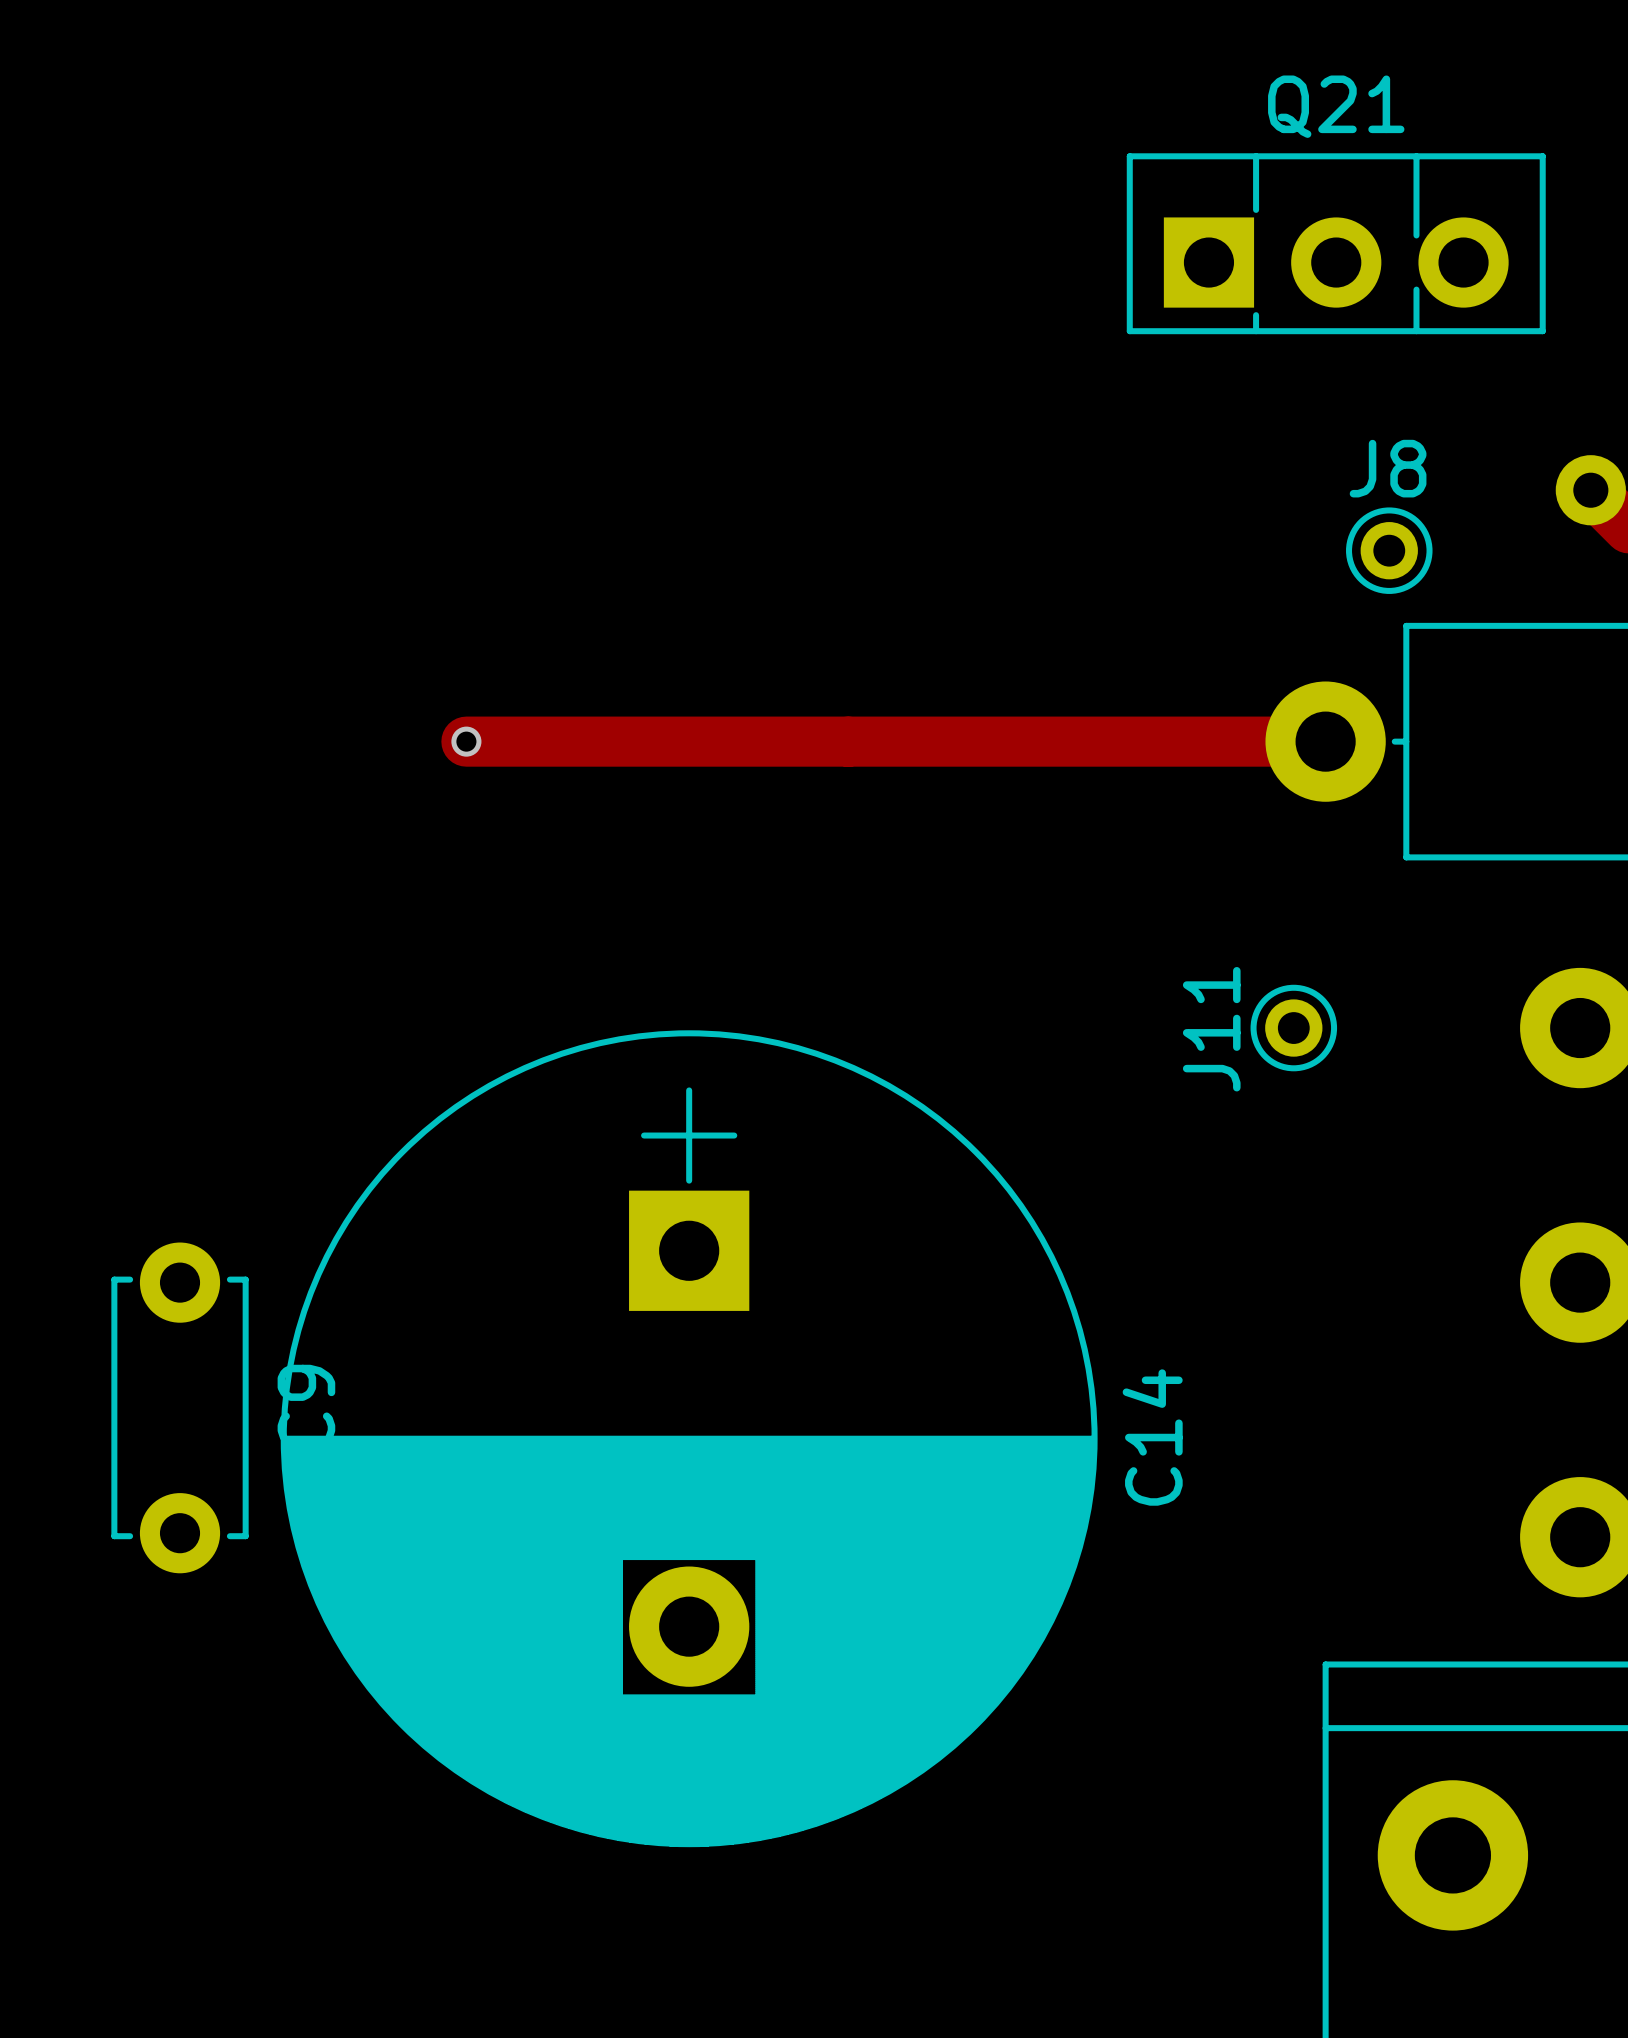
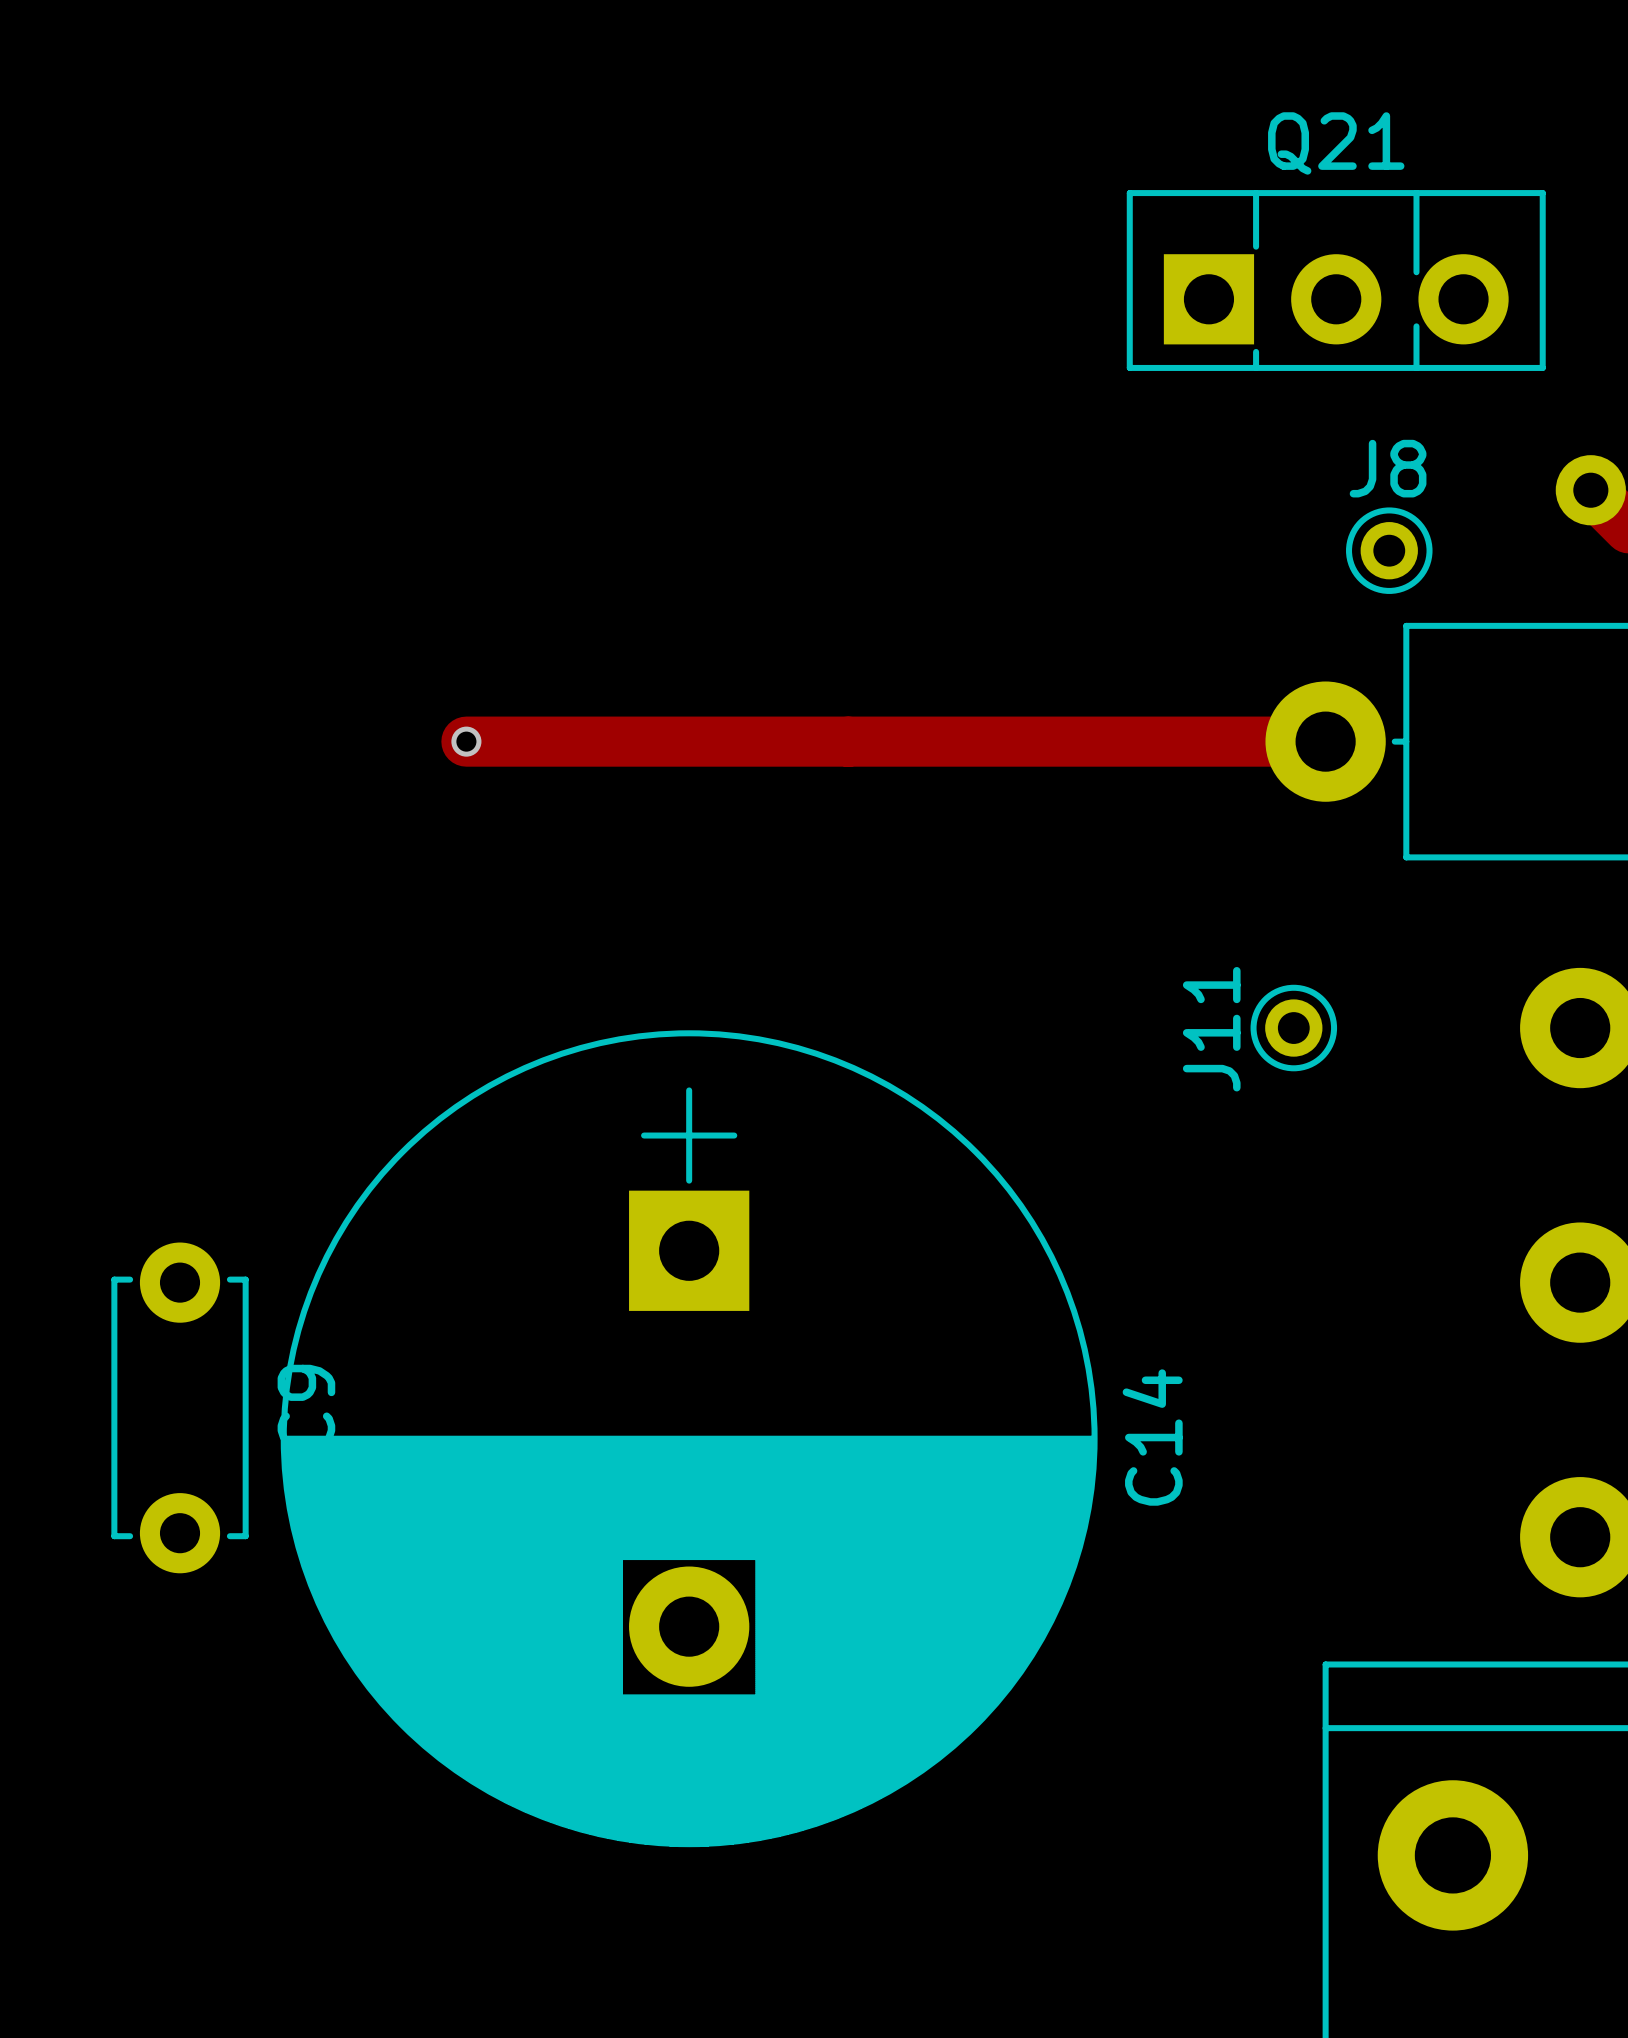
Q21 position: (1336, 243) -> (1336, 280)

